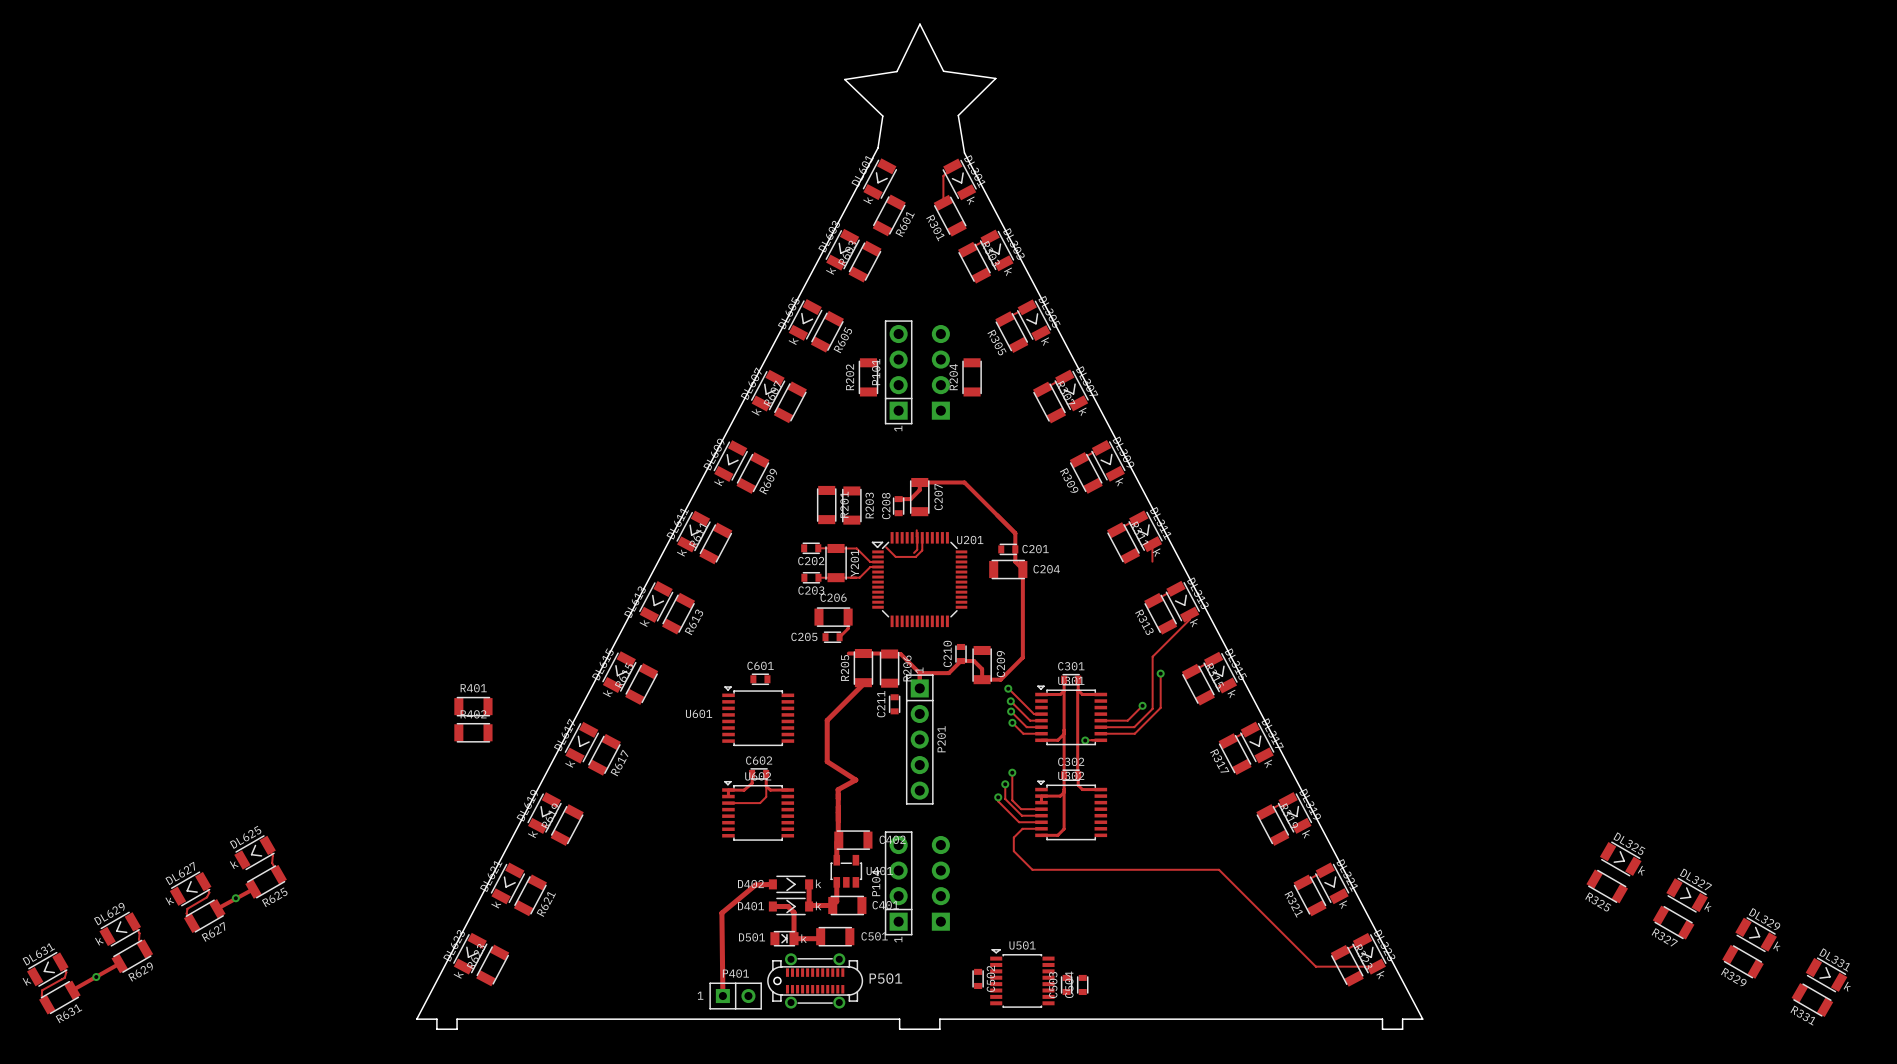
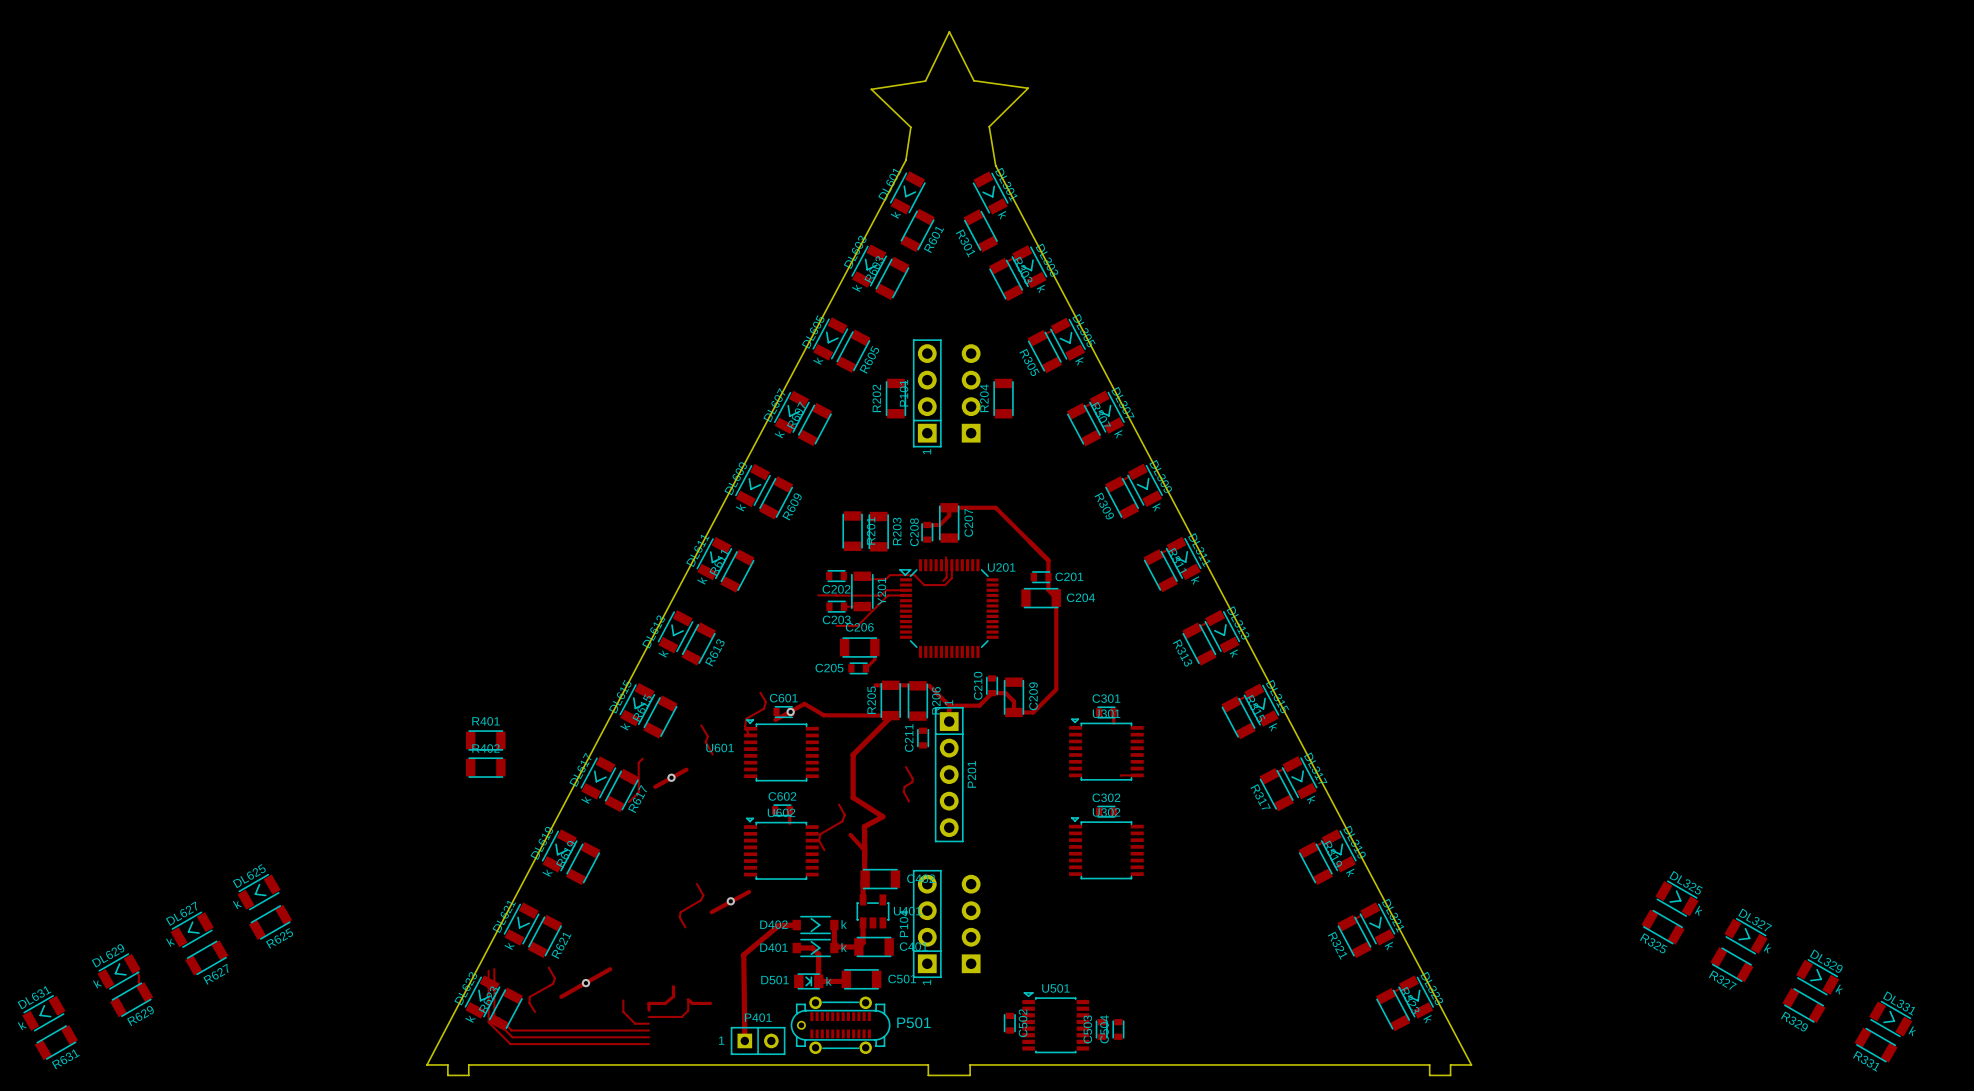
track: (952, 166) (943, 175) (943, 202) -> none
track: (1152, 544) (1152, 561) -> none
track: none -> (914, 575) (890, 575) (885, 579) (869, 579)
track: (818, 548) (856, 548) (870, 561) -> (818, 595) (880, 595) (886, 590) (897, 590)
track: (870, 567) (859, 577) (836, 577) -> (897, 595) (888, 595) (857, 625) (836, 625)
track: (1189, 614) (1189, 619) (1152, 656) (1152, 708) (1134, 727) (1100, 727) -> none
track: none -> (760, 692) (765, 701) (764, 708) (746, 718) (745, 726) (749, 735)
track: (1160, 673) (1160, 707) (1134, 733) (1100, 733) -> none
via: (1160, 673) -> none
via: none -> (790, 711)
track: (1064, 679) (1064, 829) (1057, 835) (1041, 835) -> none
track: none -> (890, 715) (823, 715) (804, 703) (775, 720)
track: (1008, 688) (1034, 714) (1041, 714) -> none
via: (1008, 688) -> none
track: (1064, 690) (1060, 694) (1041, 694) -> none
track: none -> (701, 725) (707, 736) (705, 741) (712, 754)
track: (1100, 694) (1082, 694) (1077, 690) (1078, 785) (1082, 789) (1100, 789) -> none
track: (1010, 701) (1030, 720) (1041, 720) -> none
via: (1010, 701) -> none
track: (1142, 705) (1127, 720) (1100, 720) -> none
via: (1142, 705) -> none
track: (1011, 711) (1026, 727) (1041, 727) -> none
via: (1011, 711) -> none
track: (1012, 722) (1023, 733) (1041, 733) -> none
via: (1012, 722) -> none
track: none -> (642, 758) (638, 762) (638, 792) (629, 802)
track: none -> (905, 767) (912, 778) (912, 782) (904, 786) (903, 791) (909, 801)
track: (1064, 733) (1057, 740) (1041, 740) -> none
track: none -> (686, 769) (655, 786)
via: (1085, 740) -> none
via: none -> (671, 777)
track: none -> (839, 804) (844, 815) (842, 821) (820, 834) (818, 840) (824, 850)
track: (1012, 772) (1012, 800) (1021, 809) (1041, 809) -> none
via: (1012, 772) -> none
track: (752, 773) (752, 783) (744, 790) (728, 790) (728, 796) -> (673, 986) (673, 996) (665, 1003) (648, 1003) (648, 1010)
track: (1005, 784) (1005, 799) (1021, 815) (1041, 815) -> none
via: (1005, 784) -> none
track: (787, 790) (770, 790) (766, 786) (766, 796) (760, 803) (728, 803) -> (710, 1003) (692, 1003) (688, 999) (688, 1010) (681, 1016) (648, 1016)
track: (1064, 792) (1060, 796) (1041, 796) (1041, 802) -> none
track: none -> (850, 834) (864, 850)
track: (998, 797) (998, 801) (1019, 822) (1041, 822) -> none
via: (998, 797) -> none
track: (1041, 828) (1022, 828) (1013, 837) (1013, 851) (1032, 869) (1219, 869) (1315, 966) (1376, 966) -> none
track: none -> (697, 884) (703, 895) (700, 900) (680, 912) (679, 917) (685, 927)
track: (267, 845) (272, 855) (272, 863) (278, 874) -> none
track: none -> (749, 891) (711, 912)
via: none -> (730, 901)
track: (203, 881) (209, 892) (206, 897) (187, 908) (186, 913) (192, 923) -> none
track: (253, 889) (217, 908) -> none
via: (235, 898) -> none
track: none -> (548, 967) (554, 978) (553, 983) (529, 996) (529, 1002) (535, 1011)
track: none -> (494, 968) (494, 1019) (512, 1037) (648, 1037)
track: none -> (610, 969) (561, 996)
track: none -> (488, 970) (488, 1022) (510, 1044) (648, 1044)
via: none -> (585, 983)
track: none -> (623, 1000) (623, 1011) (635, 1023) (648, 1023)
track: (60, 962) (66, 972) (64, 977) (42, 990) (41, 996) (47, 1004) -> none
track: (119, 963) (72, 990) -> none
track: none -> (499, 1018) (511, 1030) (648, 1030)
via: (96, 977) -> none

